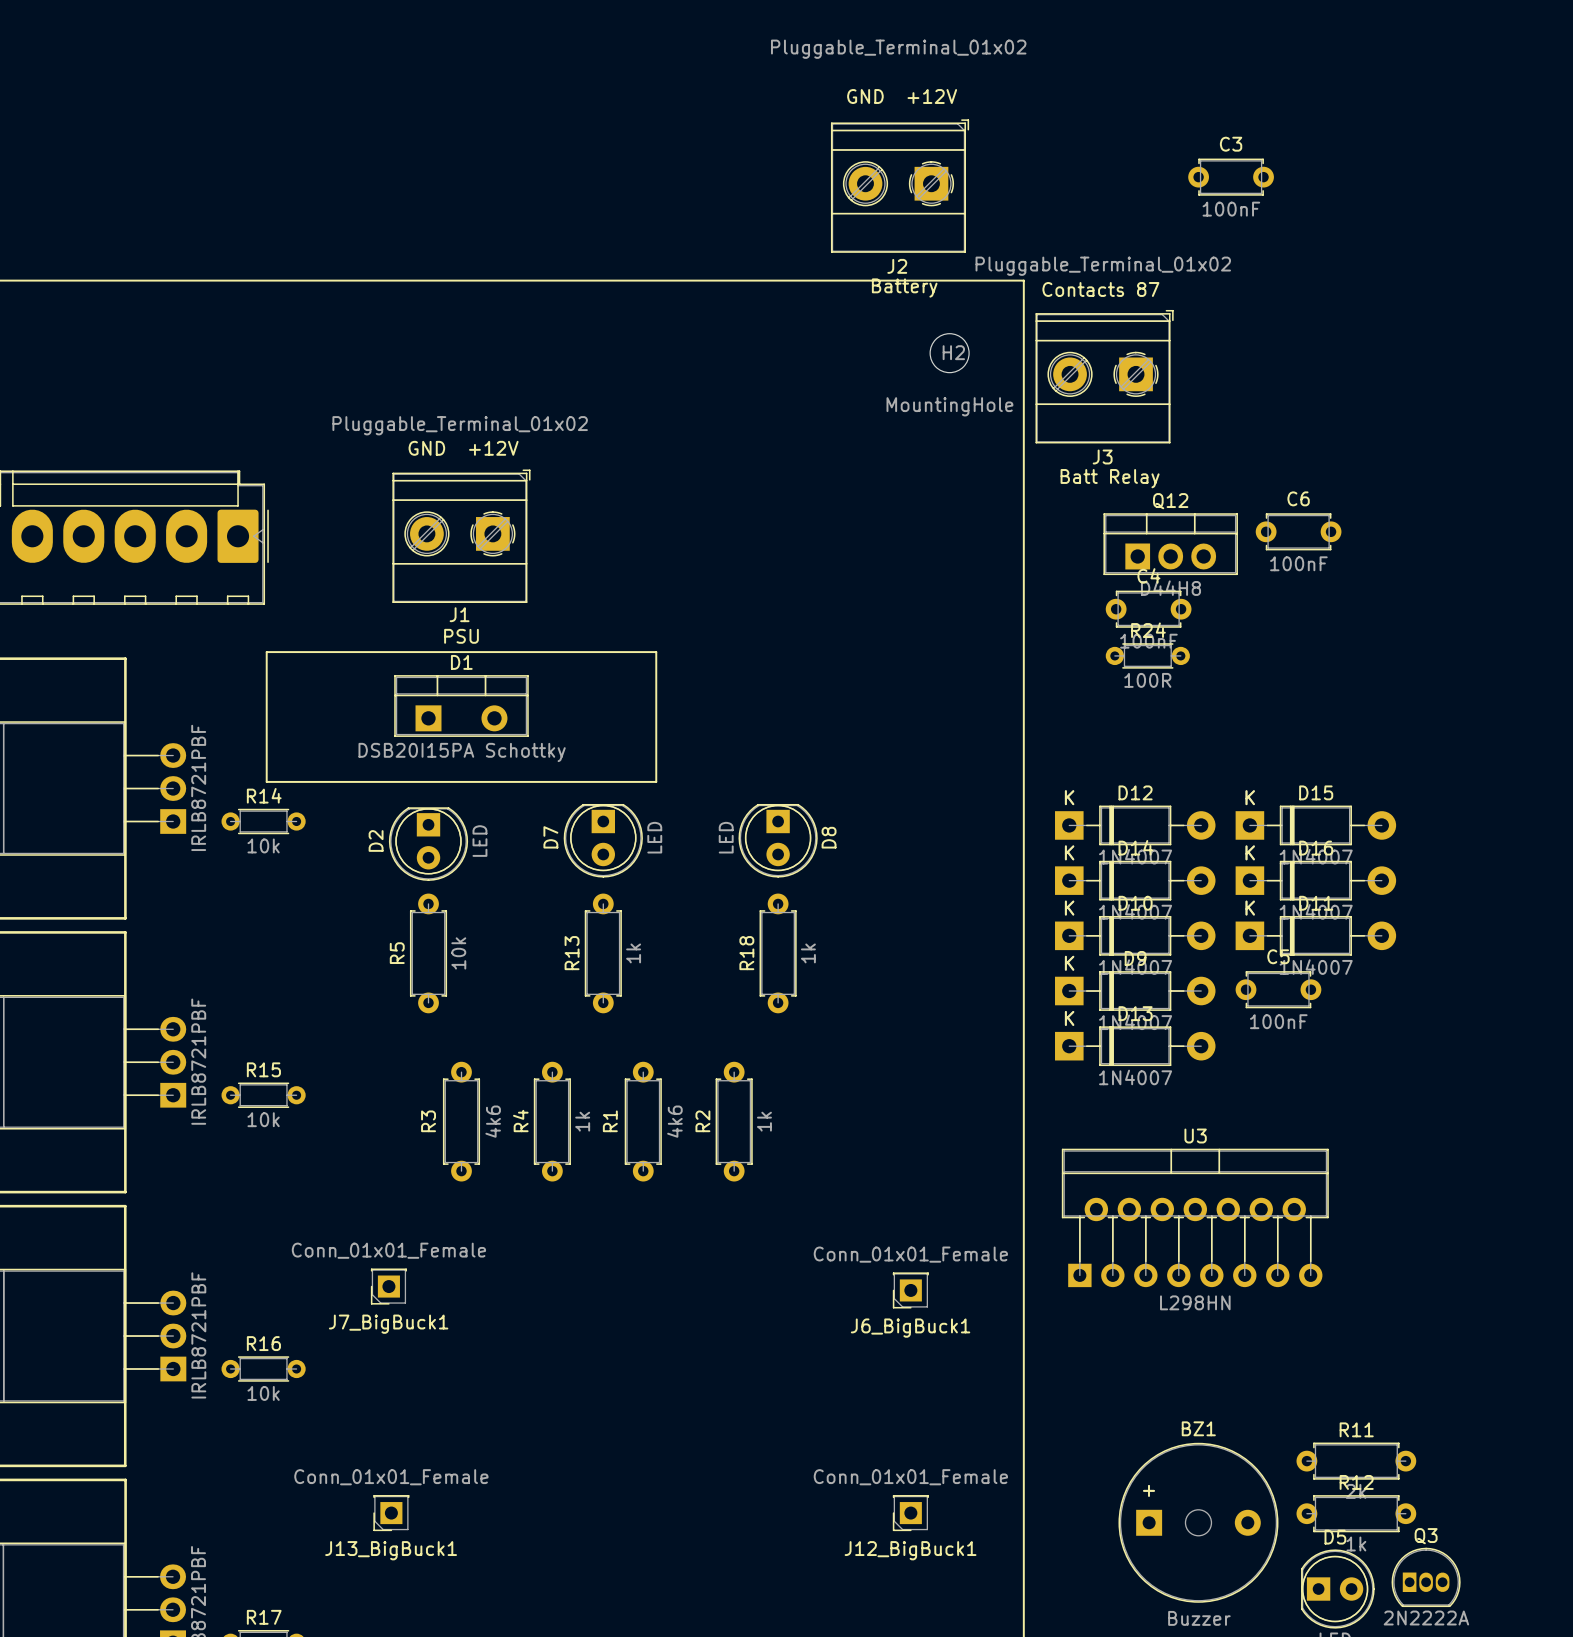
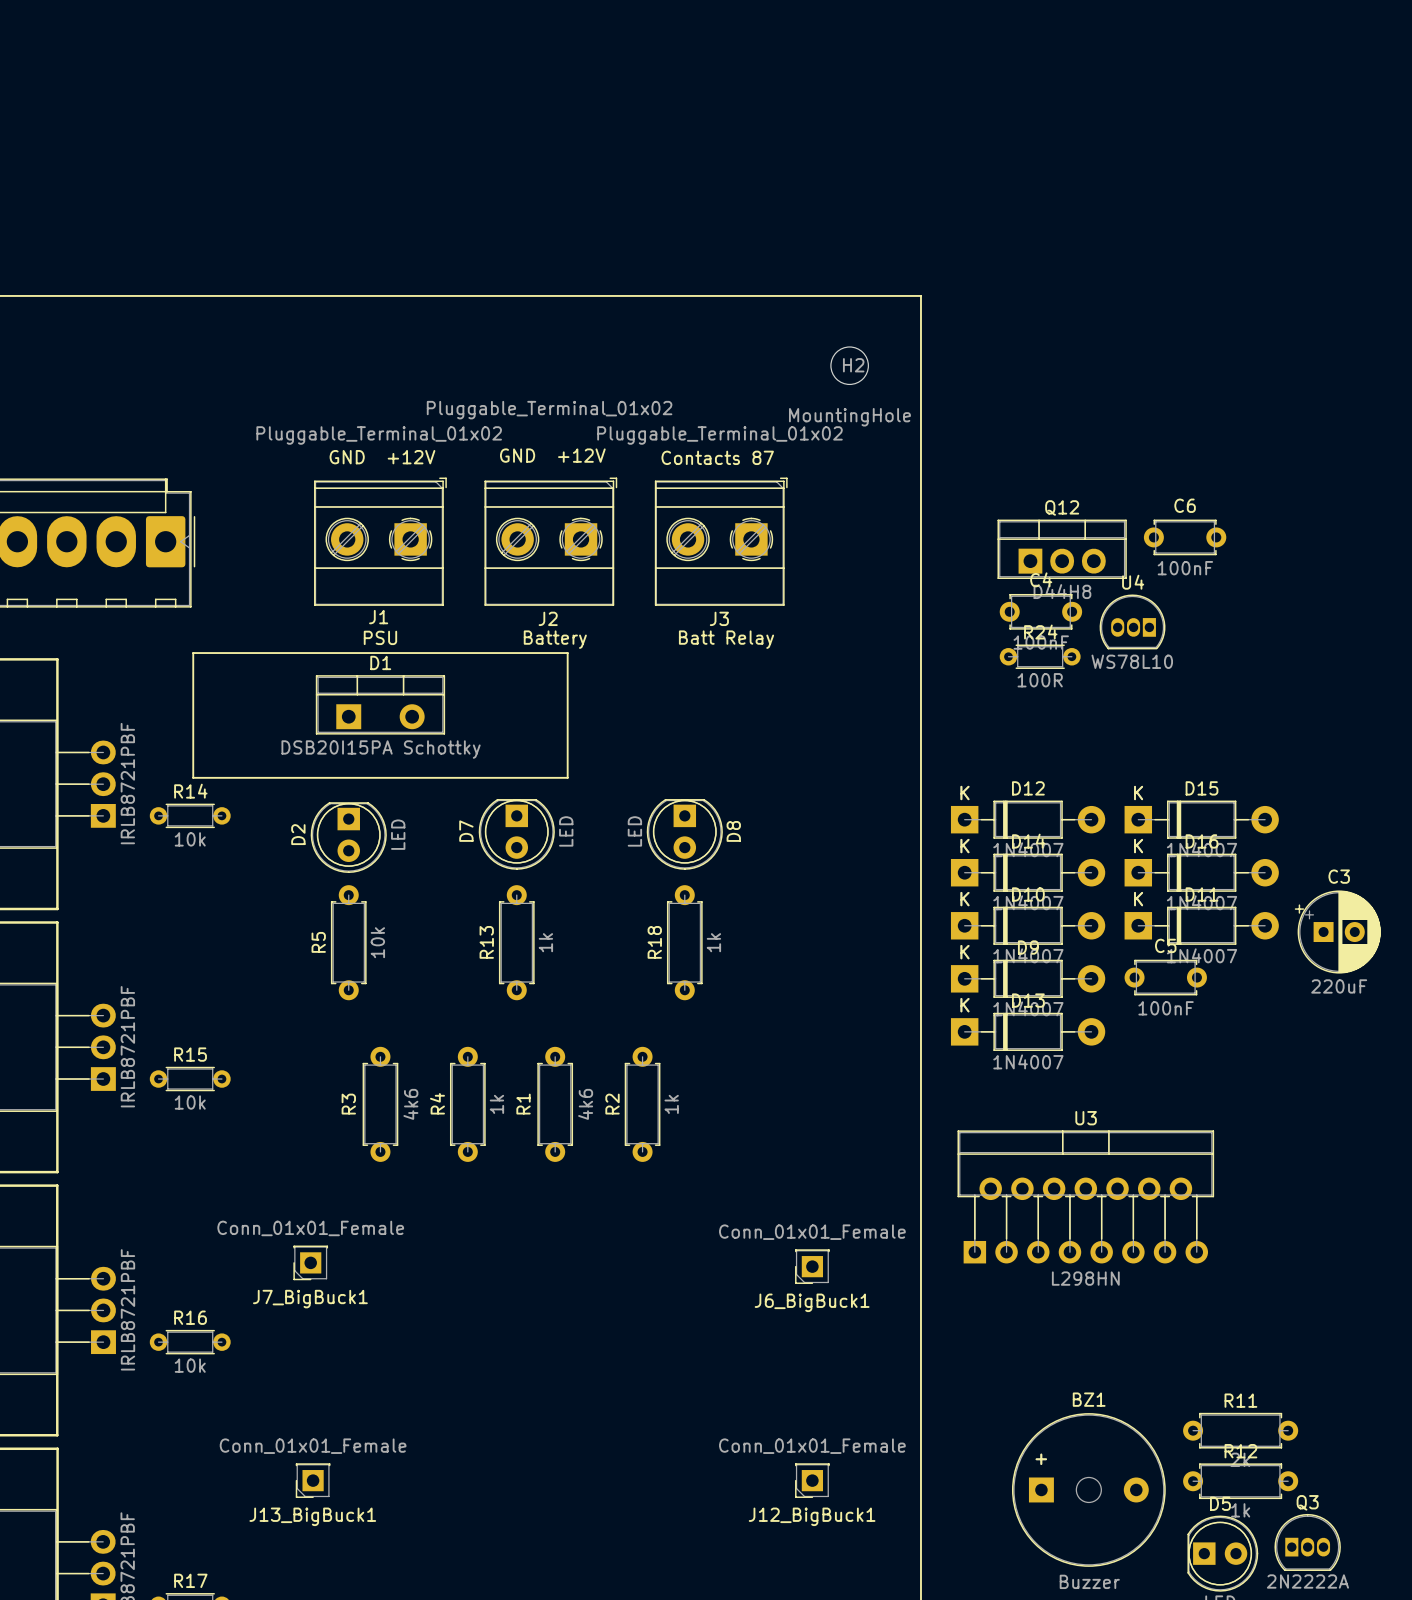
C3 footprint: [1188, 158, 1274, 196] -> [1294, 890, 1381, 974]
J2 position: (900, 186) -> (550, 541)
C3 value: 100nF (1231, 209) -> 220uF (1339, 986)
J3 position: (1104, 376) -> (721, 541)
U4: none -> WS78L10 (1132, 621)

